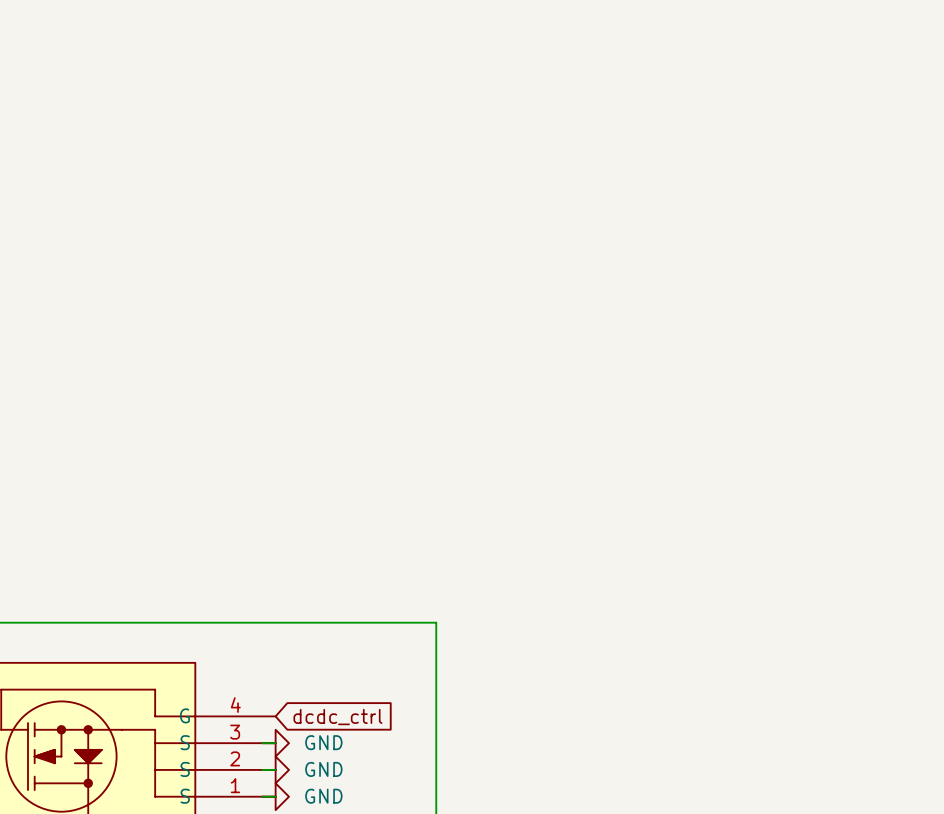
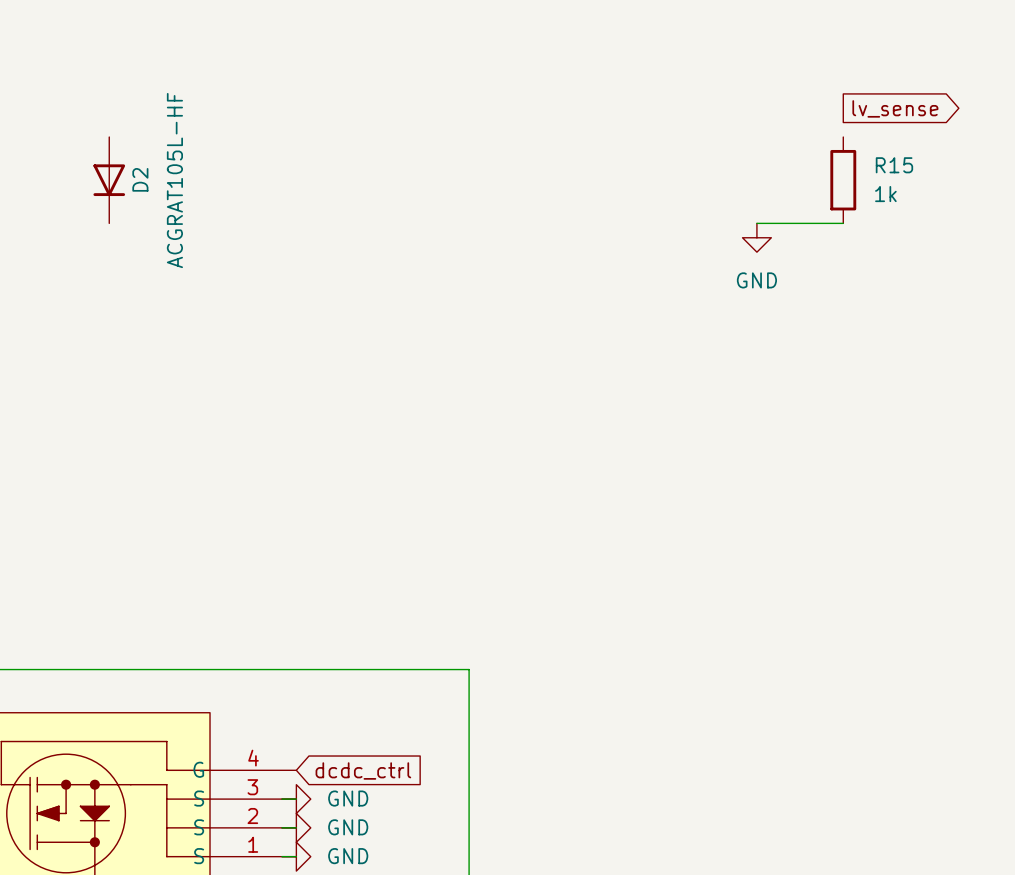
global label: none -> lv_sense (895, 108)
D2: none -> ACGRAT105L-HF (109, 180)
R15: none -> 1k (843, 180)
wire: none -> (756, 223) (843, 223)
power symbol: none -> GND (756, 237)

